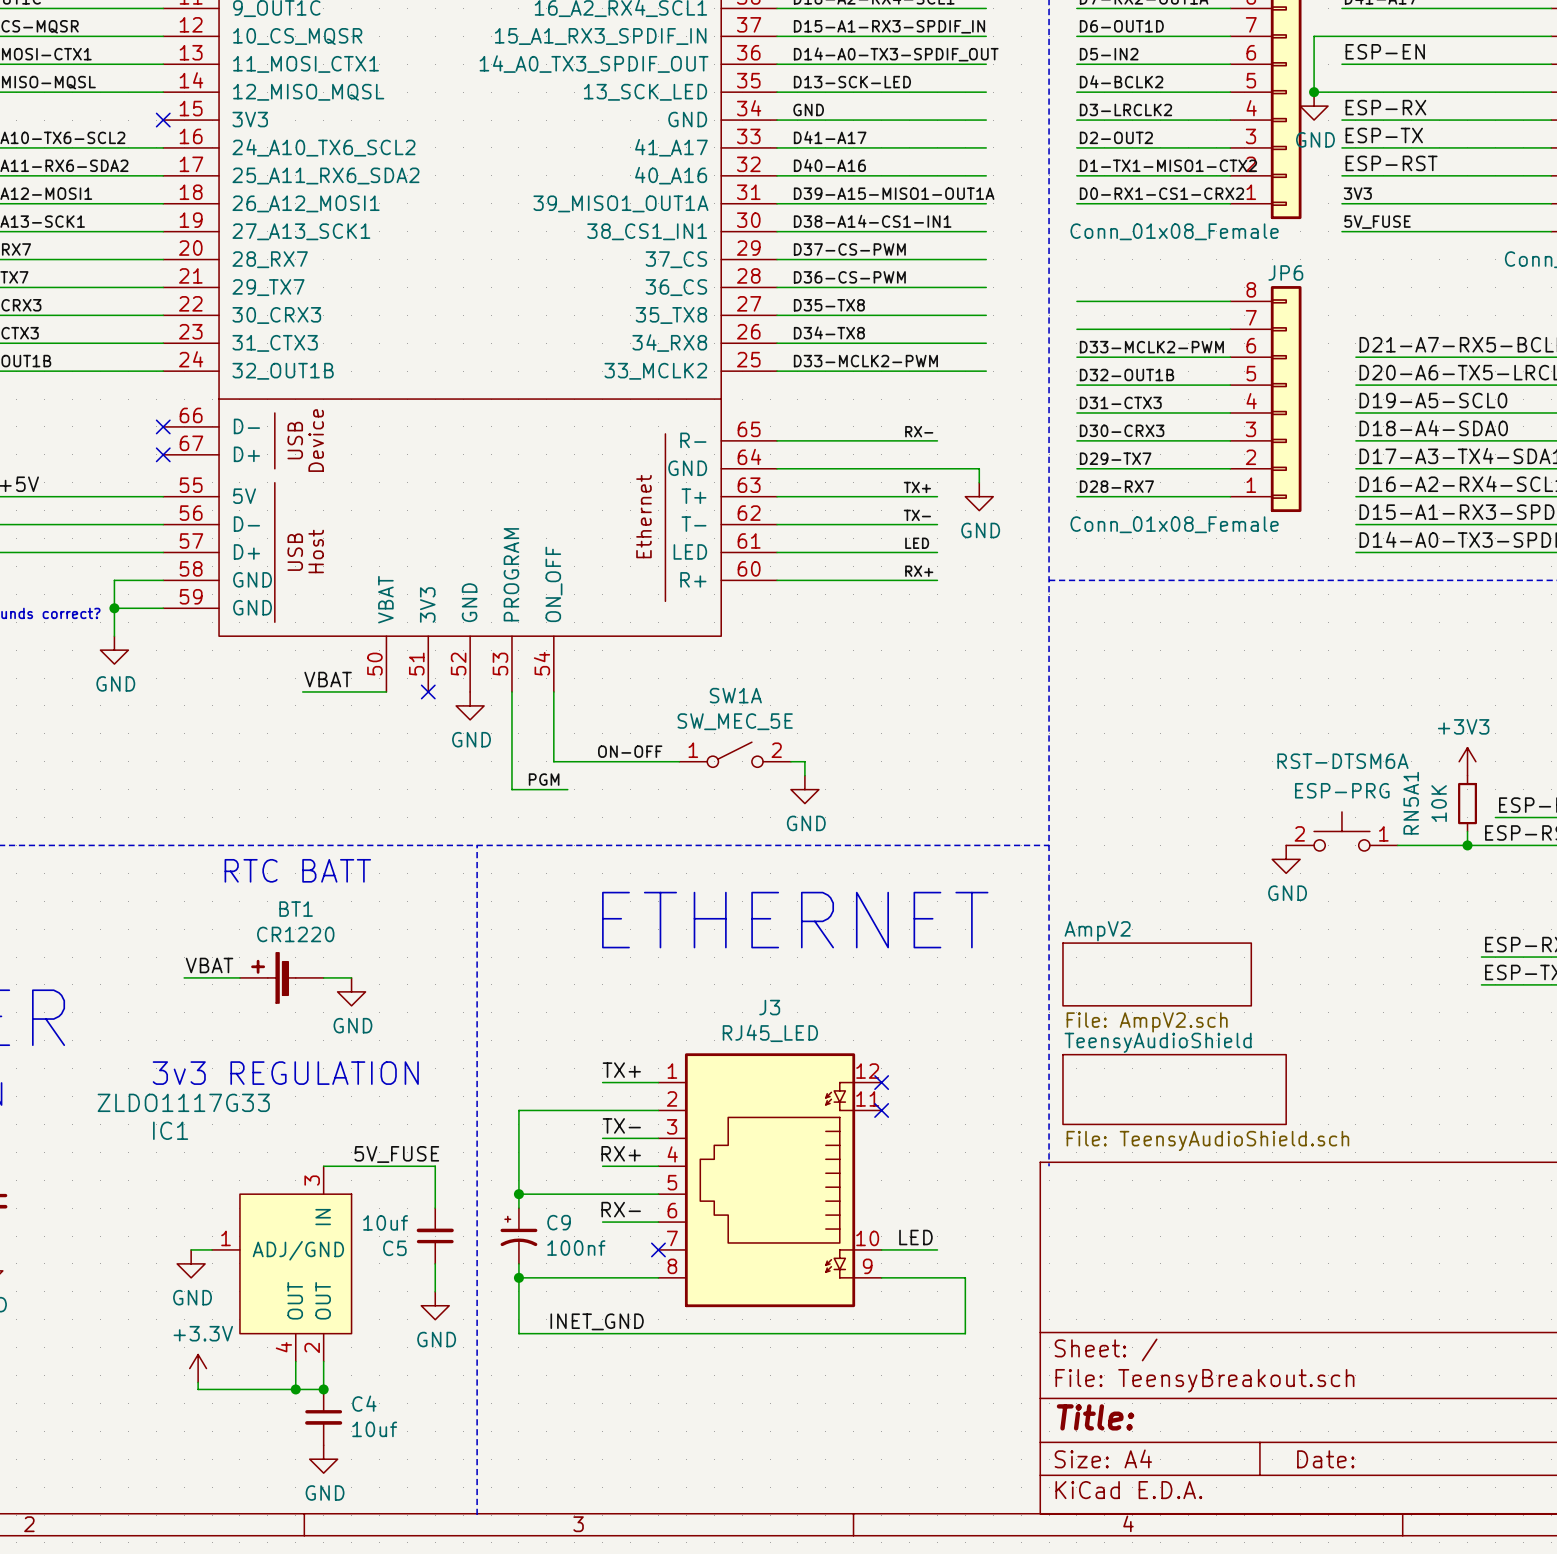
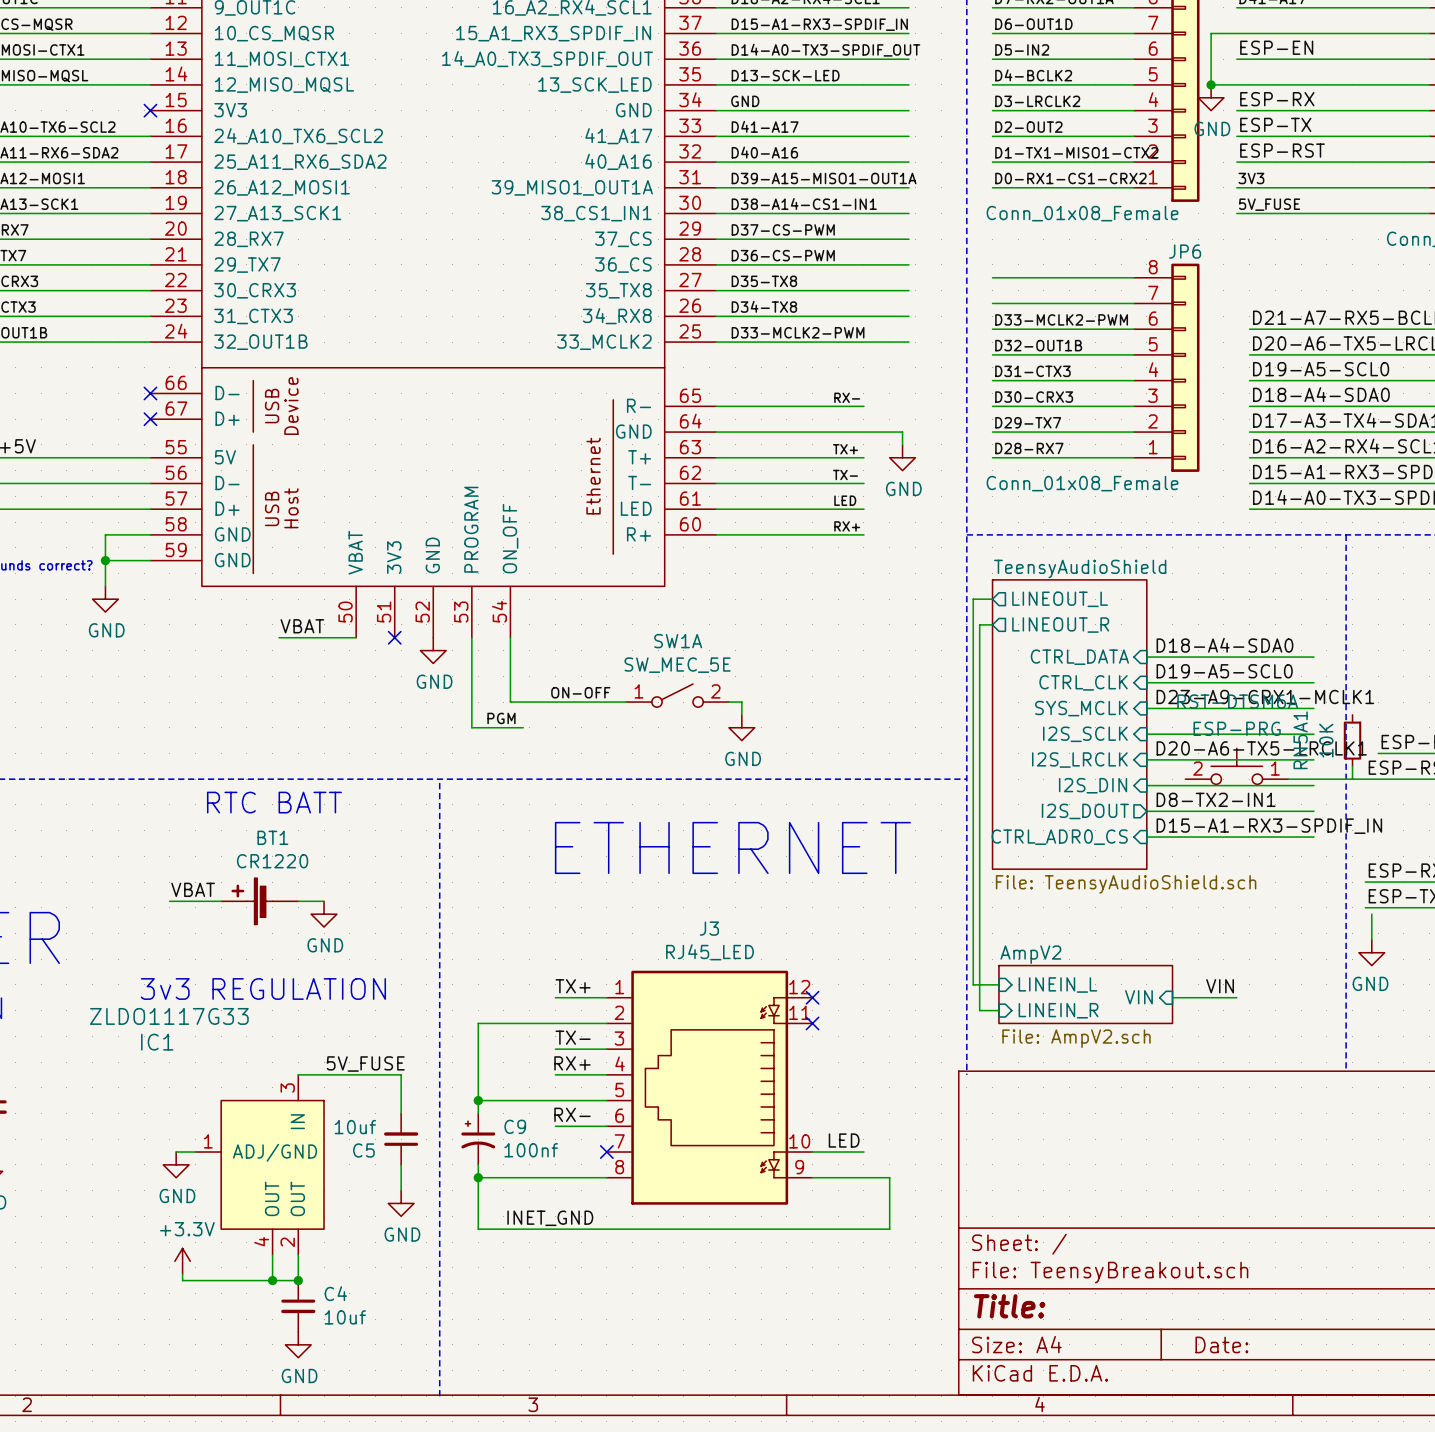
line: none -> (1346, 534) (1346, 1068)
wire: none -> (992, 599) (973, 599) (973, 984) (998, 984)
sheet pin: none -> LINEOUT_L (1060, 599)
wire: none -> (992, 624) (979, 624) (979, 1010) (998, 1010)
sheet pin: none -> LINEOUT_R (1060, 625)
label: none -> D18-A4-SDA0 (1224, 645)
wire: none -> (1146, 657) (1313, 657)
sheet pin: none -> CTRL_DATA (1079, 657)
label: none -> D19-A5-SCL0 (1224, 671)
sheet pin: none -> CTRL_CLK (1083, 682)
wire: none -> (1146, 682) (1313, 682)
label: none -> D23-A9-CRX1-MCLK1 (1265, 696)
power symbol: +3V3 (1467, 761) -> none
sheet pin: none -> SYS_MCLK (1081, 708)
wire: none -> (1146, 708) (1313, 708)
sheet TeensyAudioShield: none -> File: TeensyAudioShield.sch (1069, 724)
sheet pin: none -> I2S_SCLK (1085, 734)
wire: none -> (1146, 734) (1313, 734)
label: none -> D20-A6-TX5-LRCLK1 (1261, 748)
sheet pin: none -> I2S_LRCLK (1079, 760)
wire: none -> (1146, 759) (1313, 759)
junction: (1467, 845) -> none
sheet pin: none -> I2S_DIN (1093, 785)
wire: none -> (1146, 785) (1313, 785)
power symbol: GND (1286, 859) -> none
label: none -> D8-TX2-IN1 (1216, 799)
sheet pin: none -> I2S_DOUT (1085, 811)
wire: none -> (1146, 811) (1313, 811)
label: none -> D15-A1-RX3-SPDIF_IN (1269, 826)
sheet pin: none -> CTRL_ADR0_CS (1059, 837)
wire: none -> (1146, 837) (1313, 837)
sheet AmpV2 position: (1157, 974) -> (1085, 994)
wire: none -> (1371, 914) (1371, 939)
power symbol: none -> GND (1371, 952)
sheet pin: none -> LINEIN_L (1057, 985)
label: none -> VIN (1220, 986)
sheet pin: none -> VIN (1138, 997)
wire: none -> (1172, 997) (1236, 997)
sheet TeensyAudioShield: File: TeensyAudioShield.sch (1174, 1089) -> none
sheet pin: none -> LINEIN_R (1058, 1010)

